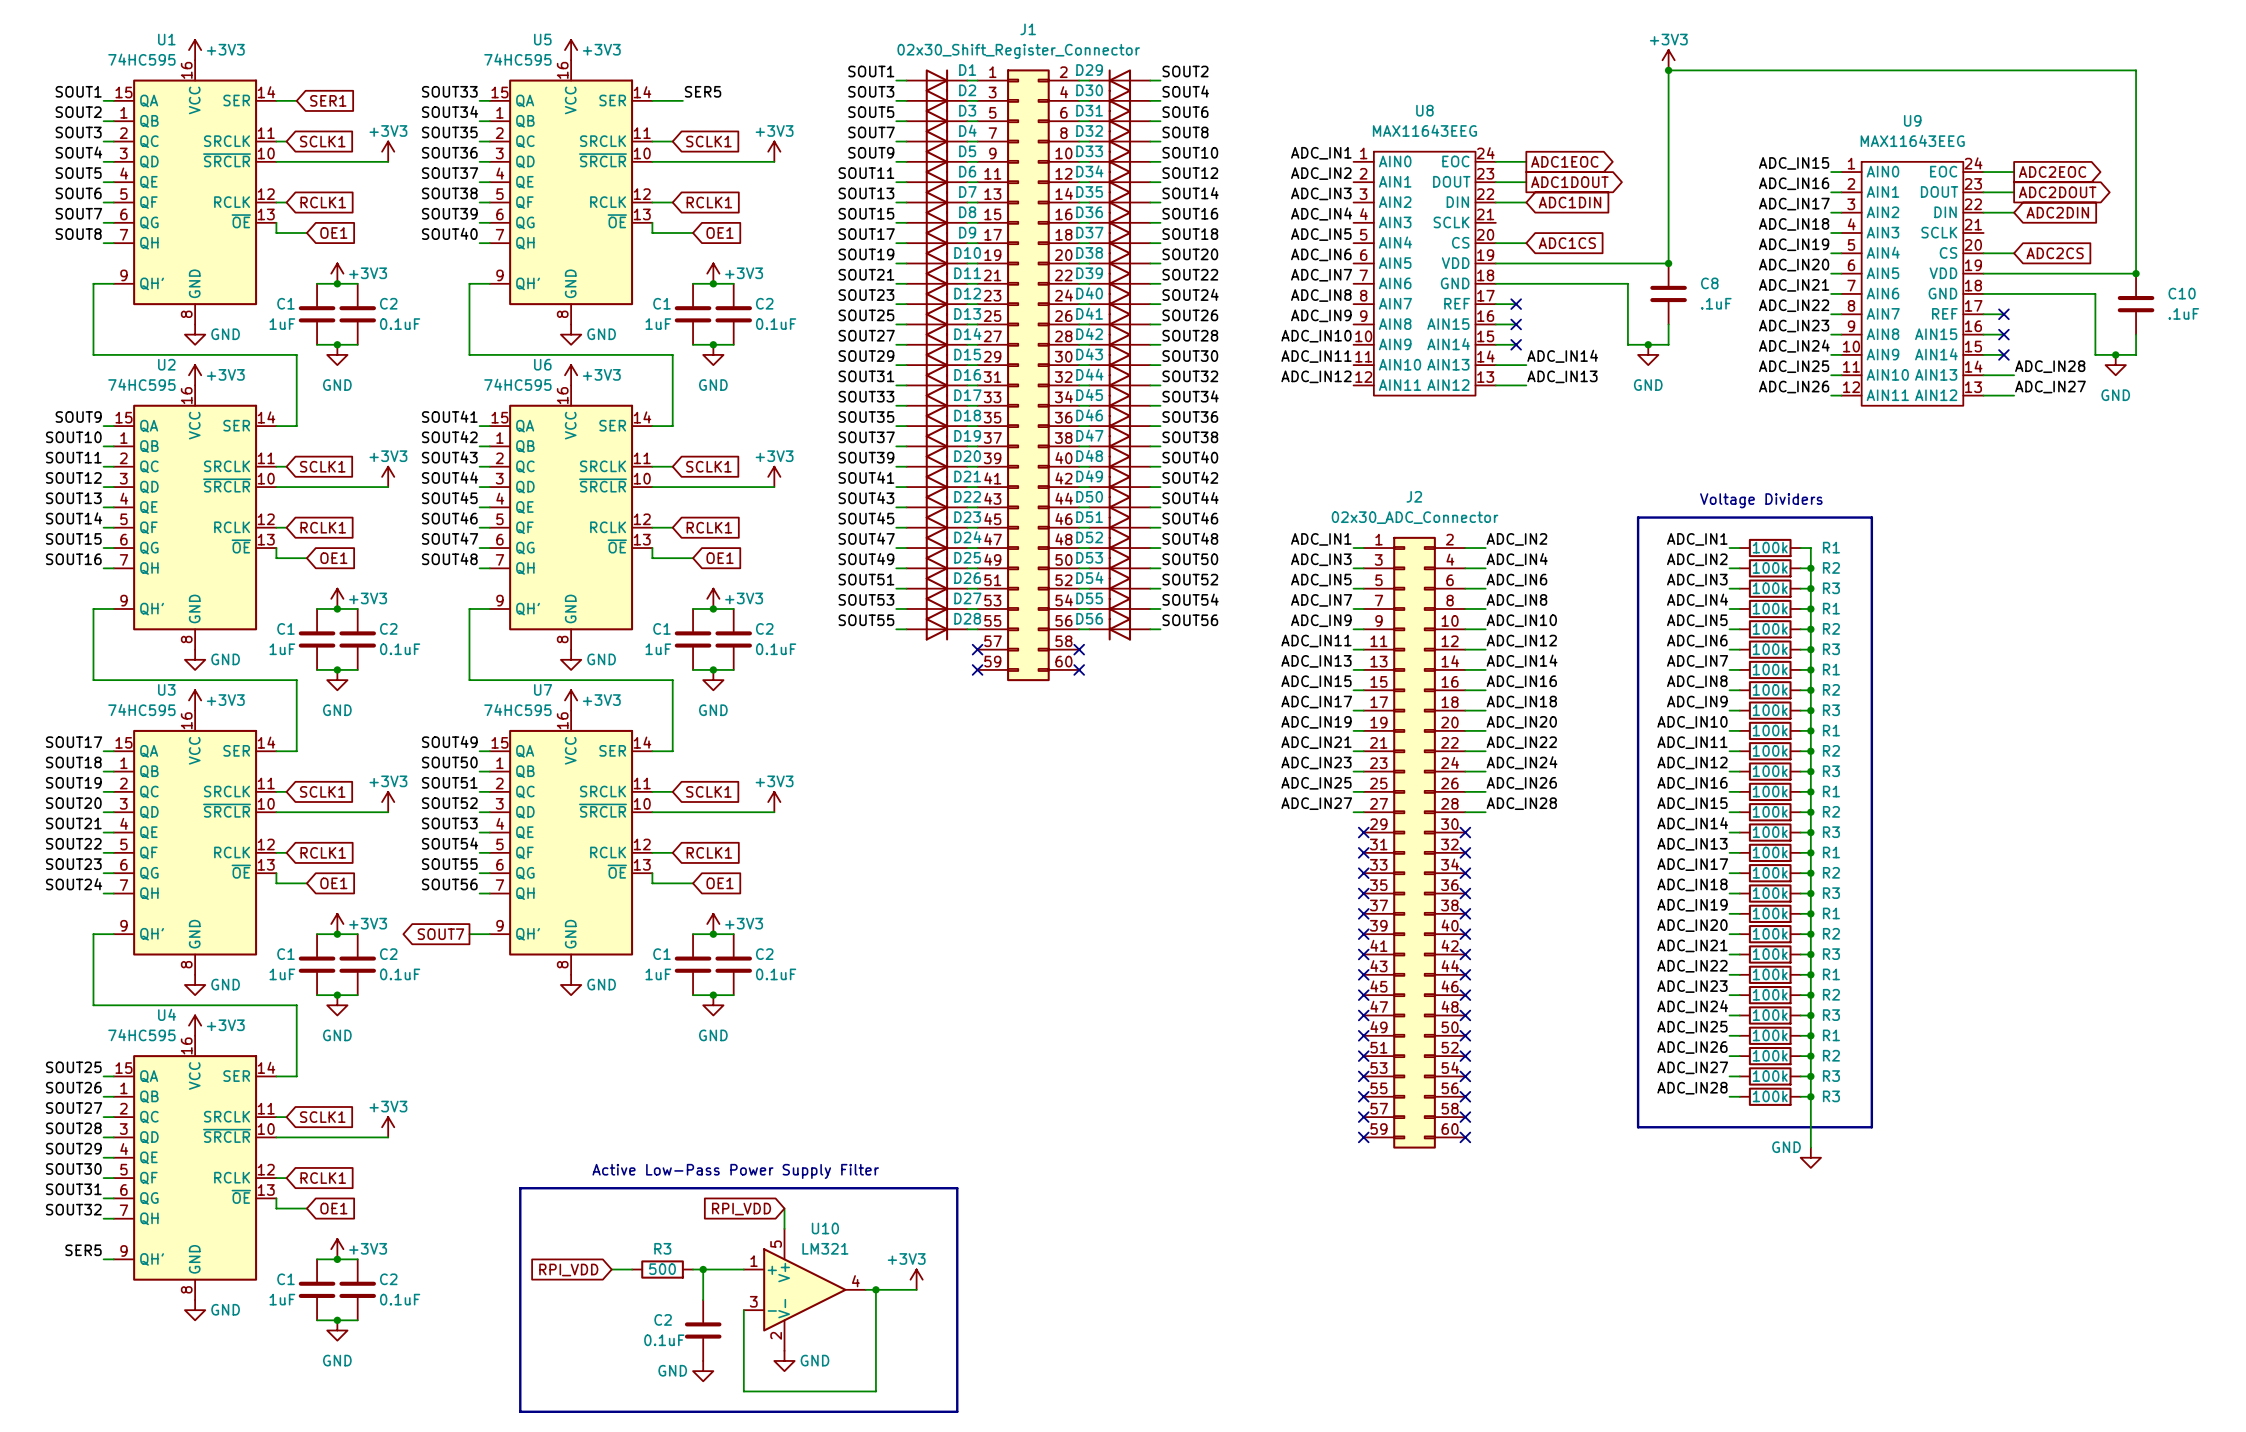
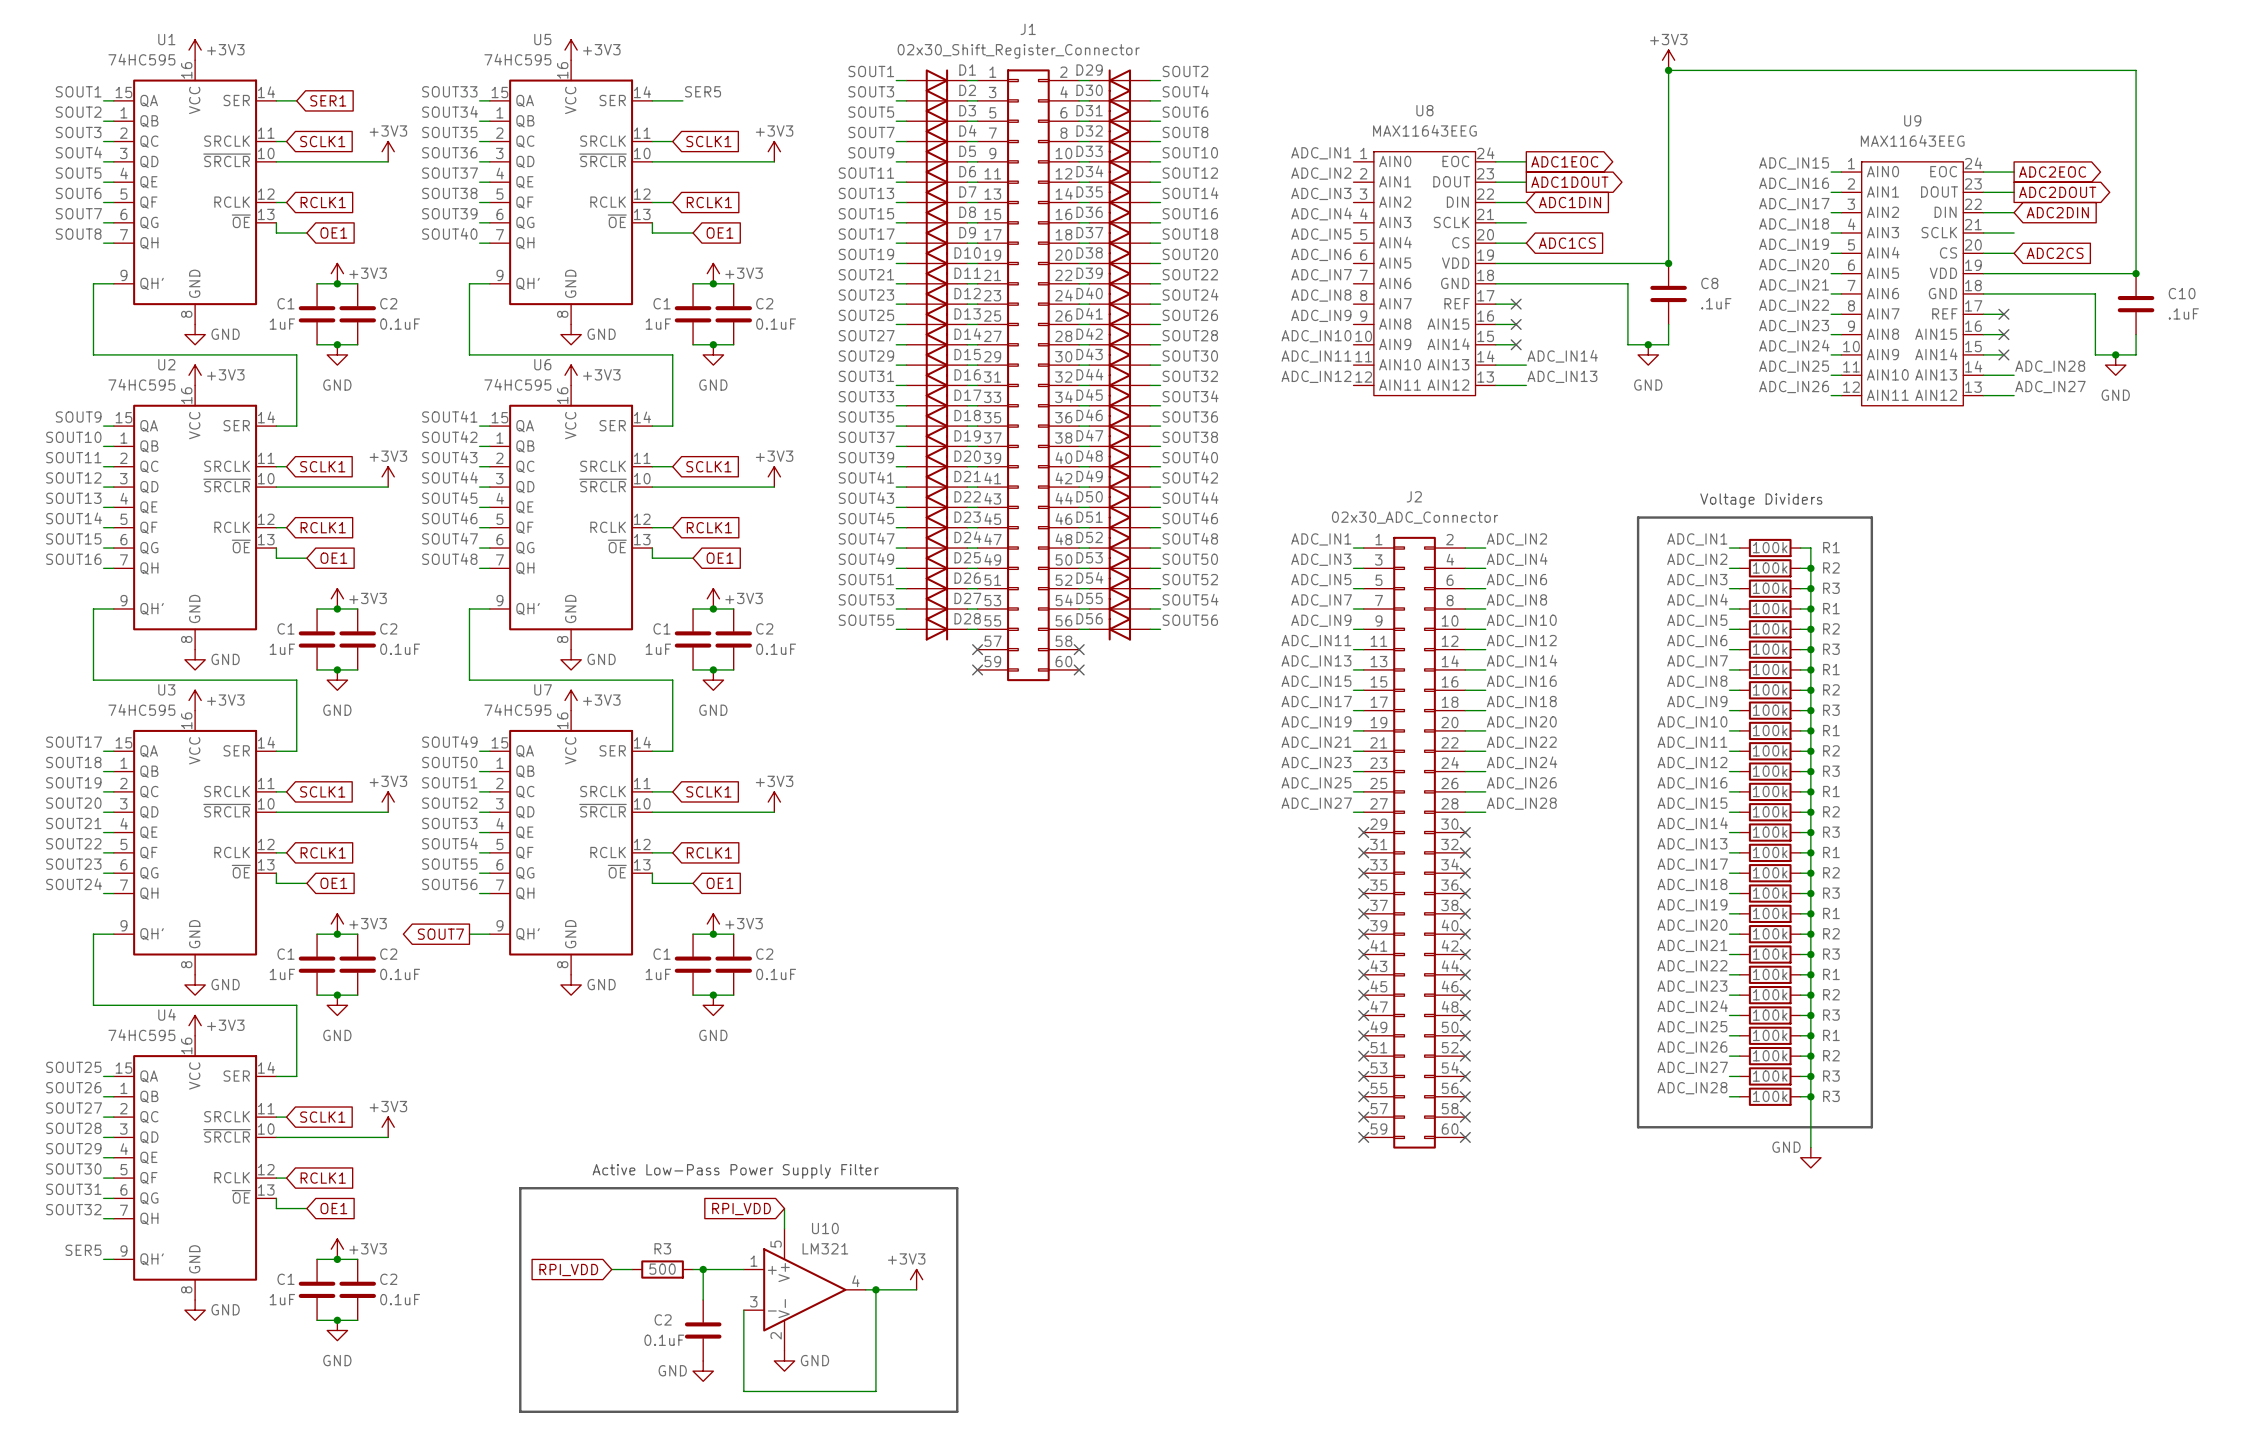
wire: none -> (1495, 222) (1526, 222)
wire: none -> (1983, 233) (2014, 233)

